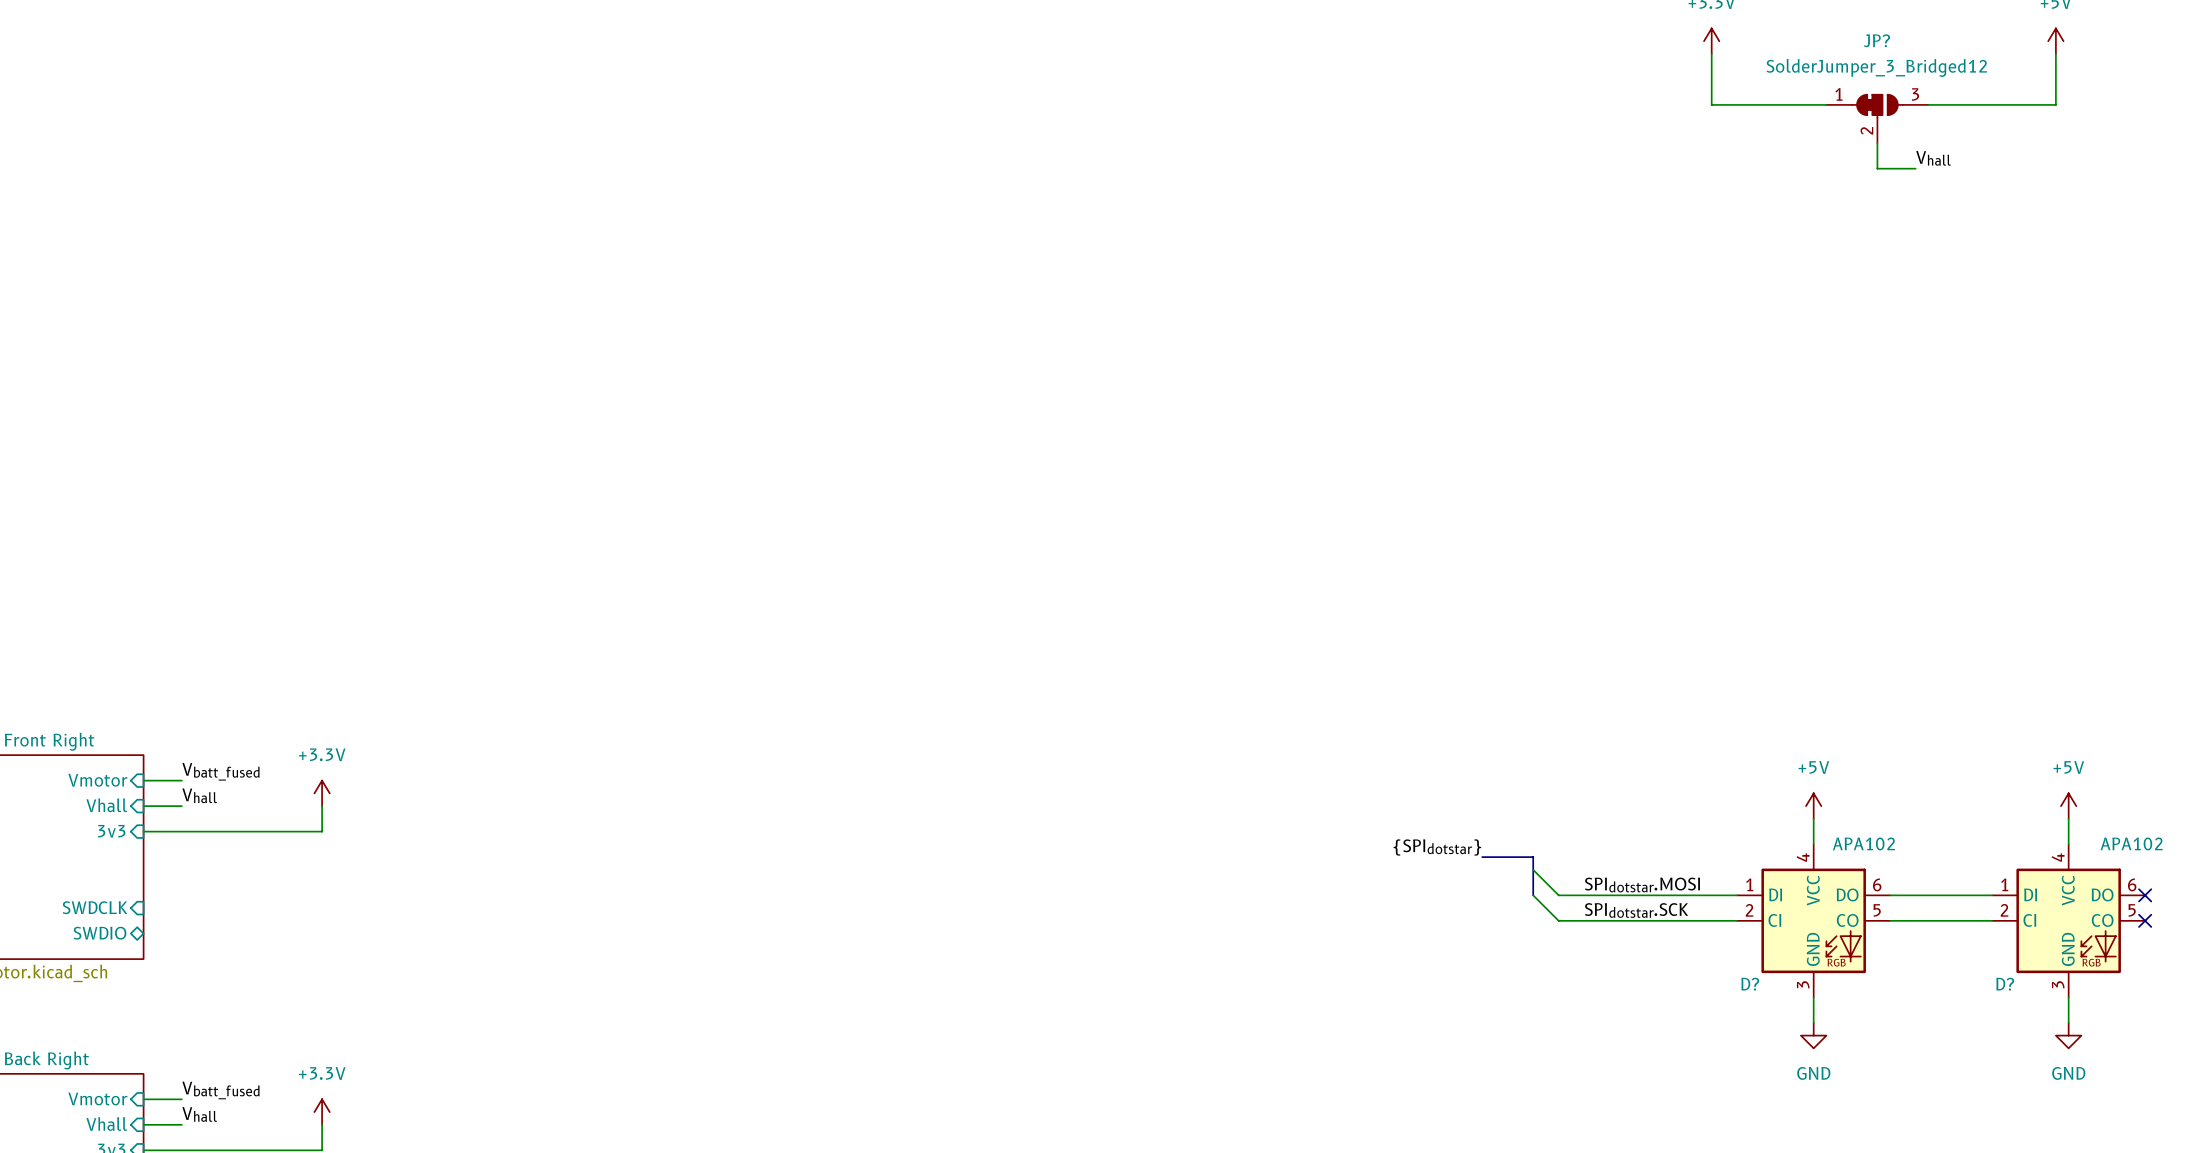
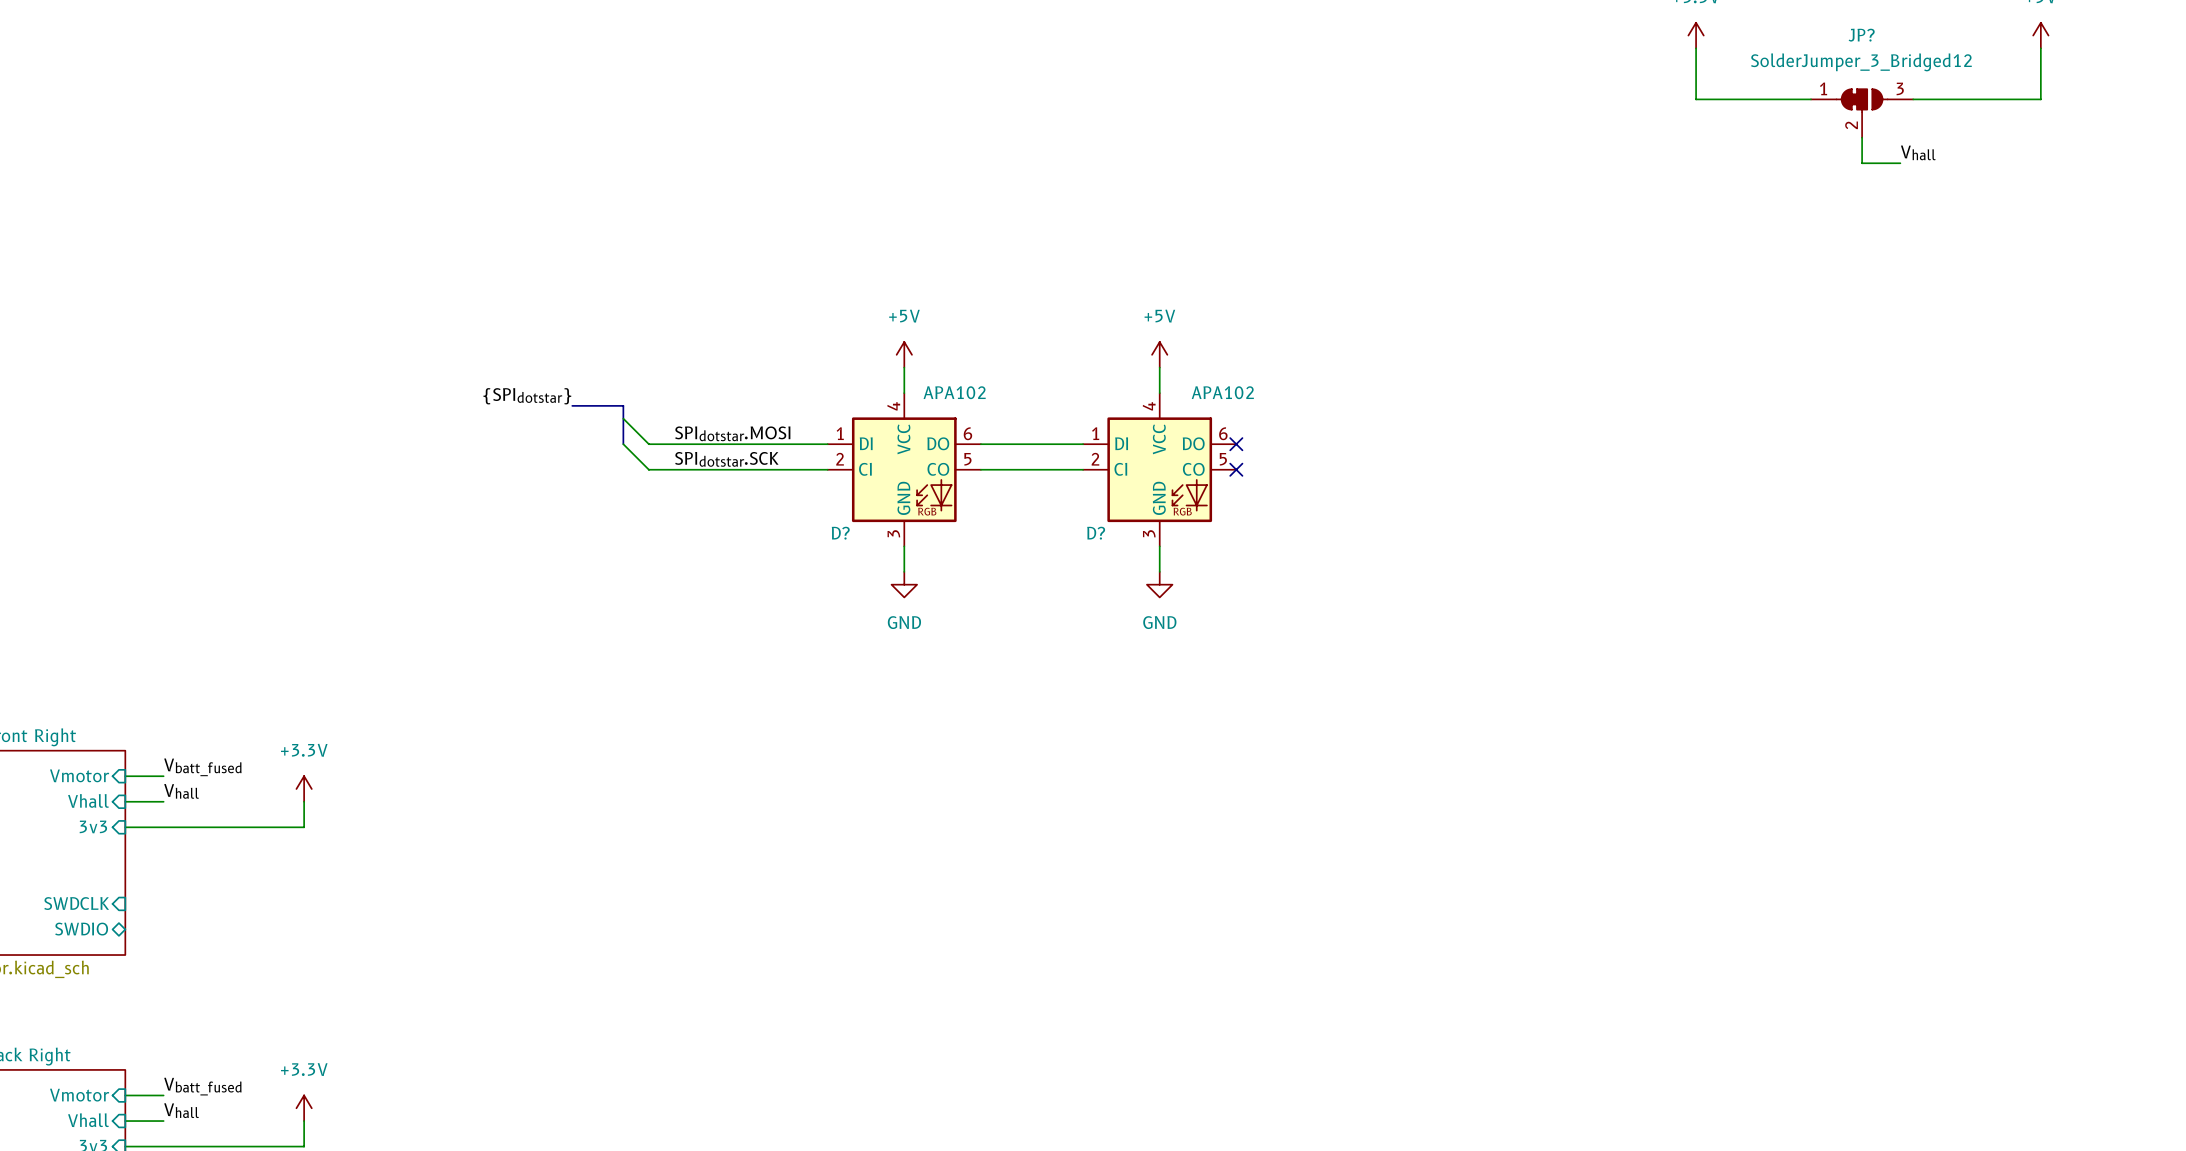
power symbol: none -> +5V (904, 354)
power symbol: none -> +5V (1159, 354)
wire: none -> (904, 367) (904, 393)
wire: none -> (1159, 367) (1159, 393)
label: none -> {SPIdotstar} (527, 396)
bus: none -> (572, 405) (623, 405) (623, 444)
wire: none -> (623, 418) (648, 444) (827, 444)
label: none -> SPIdotstar.MOSI (732, 433)
wire: none -> (623, 444) (648, 469) (827, 469)
wire: none -> (980, 444) (1083, 444)
no-connect mark: none -> (1236, 444)
label: none -> SPIdotstar.SCK (726, 459)
D?: none -> APA102 (904, 469)
wire: none -> (980, 469) (1083, 469)
D?: none -> APA102 (1159, 469)
no-connect mark: none -> (1236, 469)
wire: none -> (904, 546) (904, 571)
wire: none -> (1159, 546) (1159, 571)
power symbol: none -> GND (904, 584)
power symbol: none -> GND (1159, 584)
power symbol: +5V (1813, 806) -> none
power symbol: +5V (2068, 806) -> none
wire: (1813, 818) (1813, 844) -> none
wire: (2068, 818) (2068, 844) -> none
label: {SPIdotstar} (1437, 847) -> none
bus: (1482, 857) (1533, 857) (1533, 895) -> none
wire: (1533, 869) (1558, 895) (1737, 895) -> none
label: SPIdotstar.MOSI (1642, 884) -> none
wire: (1533, 895) (1558, 920) (1737, 920) -> none
wire: (1890, 895) (1992, 895) -> none
no-connect mark: (2145, 895) -> none
label: SPIdotstar.SCK (1636, 910) -> none
D?: APA102 (1813, 920) -> none
wire: (1890, 920) (1992, 920) -> none
D?: APA102 (2068, 920) -> none
no-connect mark: (2145, 920) -> none
wire: (1813, 997) (1813, 1022) -> none
wire: (2068, 997) (2068, 1022) -> none
power symbol: GND (1813, 1035) -> none
power symbol: GND (2068, 1035) -> none

